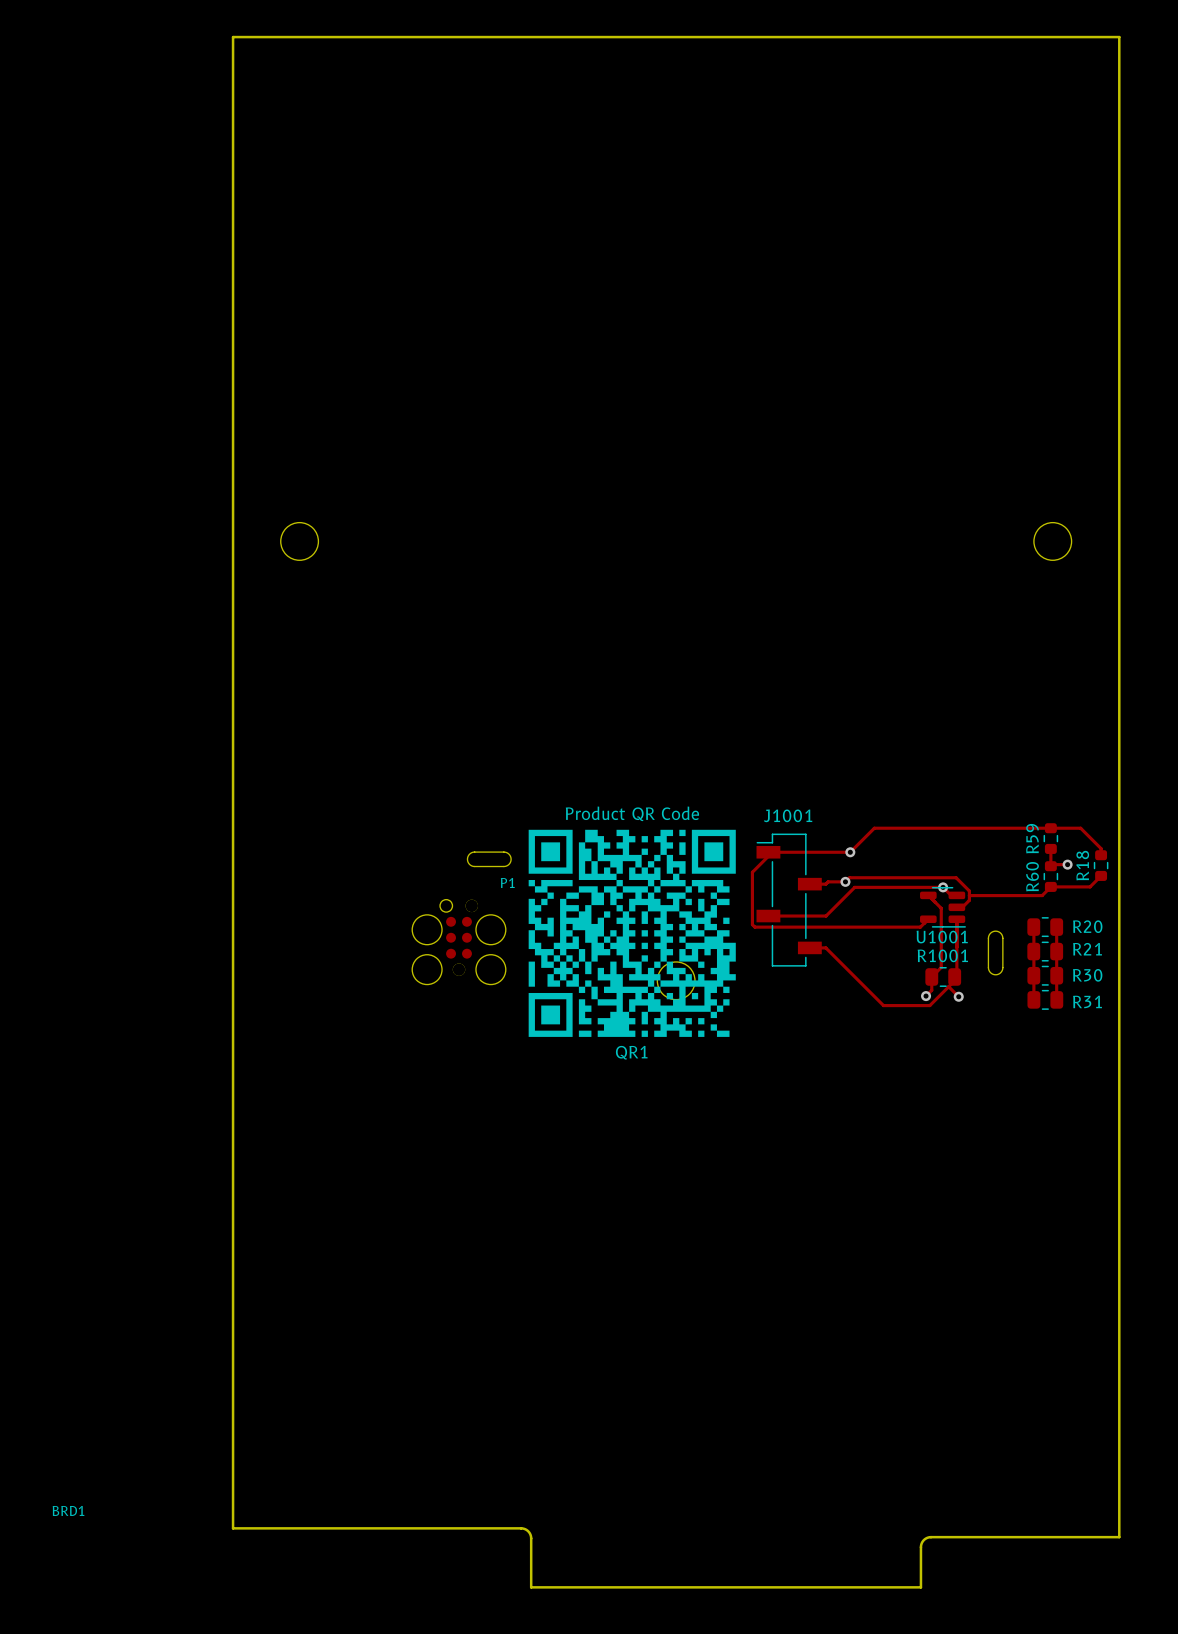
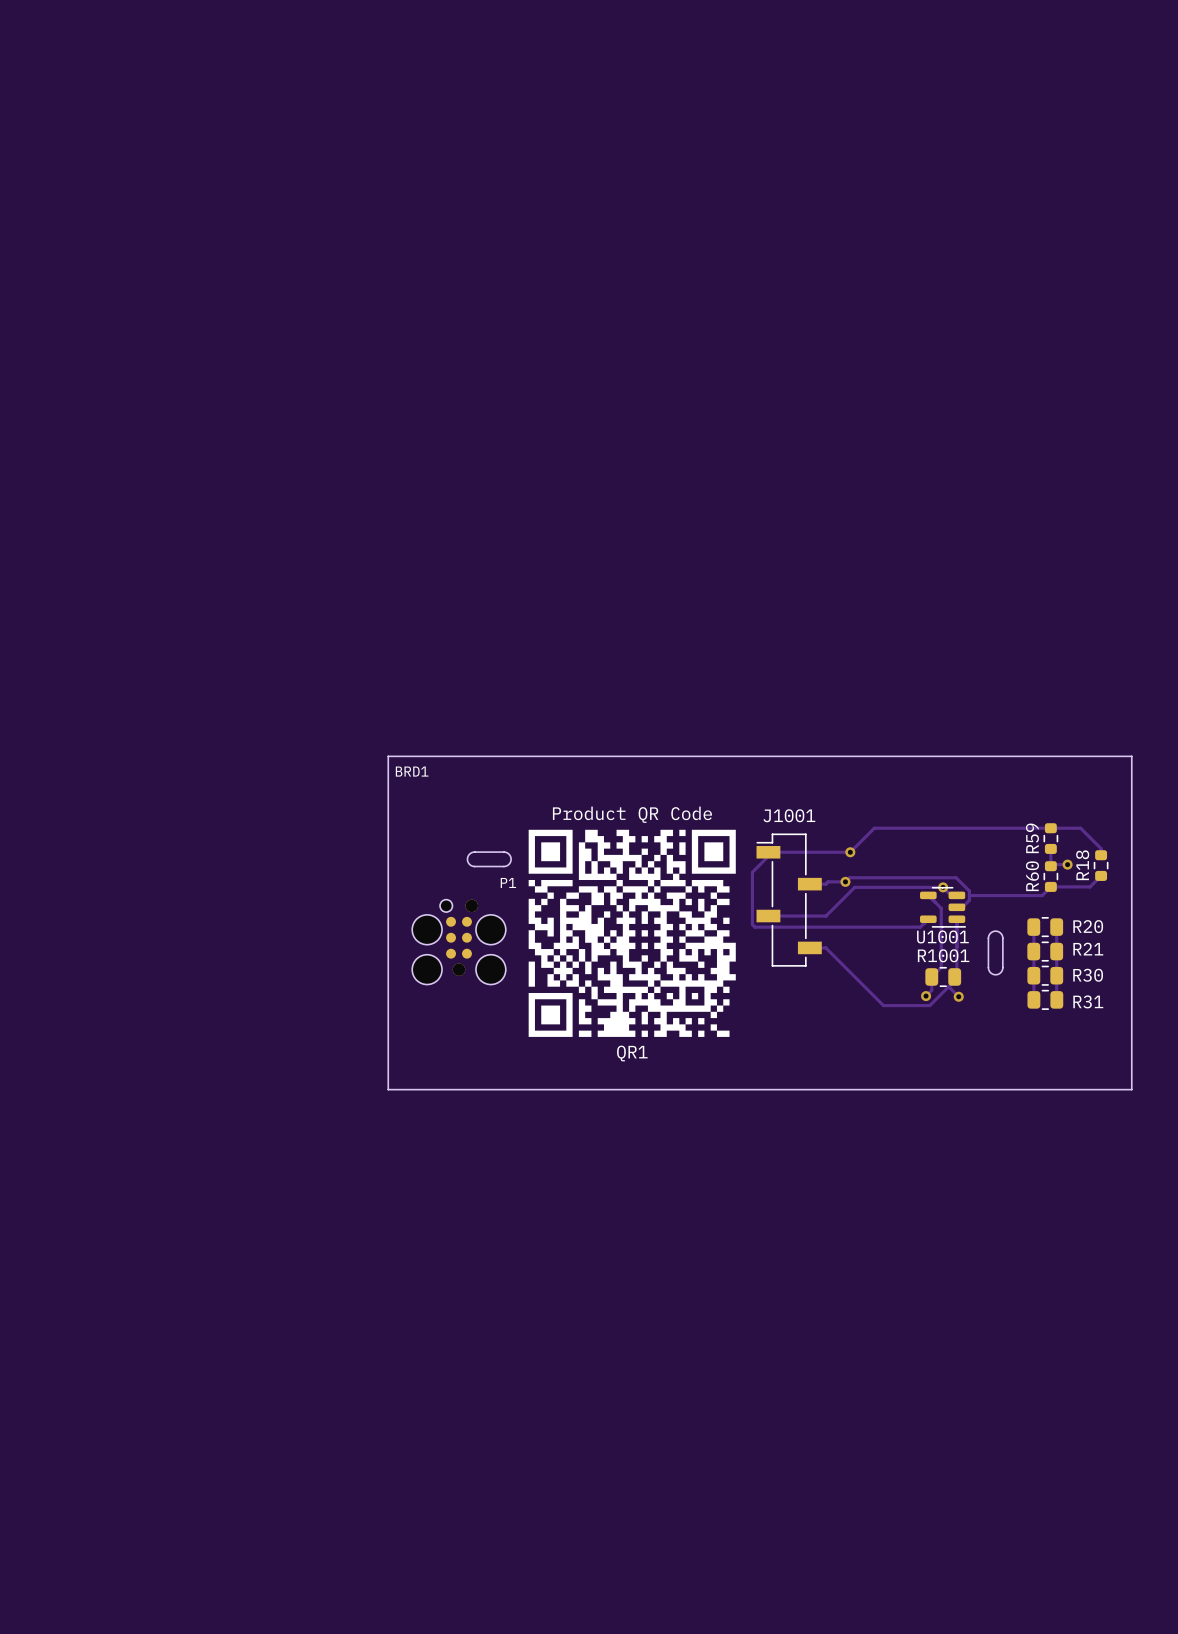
BRD1 footprint: [231, 35, 1121, 1589] -> [387, 755, 1133, 1091]
BRD1 name position: BRD1 (68, 1510) -> BRD1 (412, 771)

